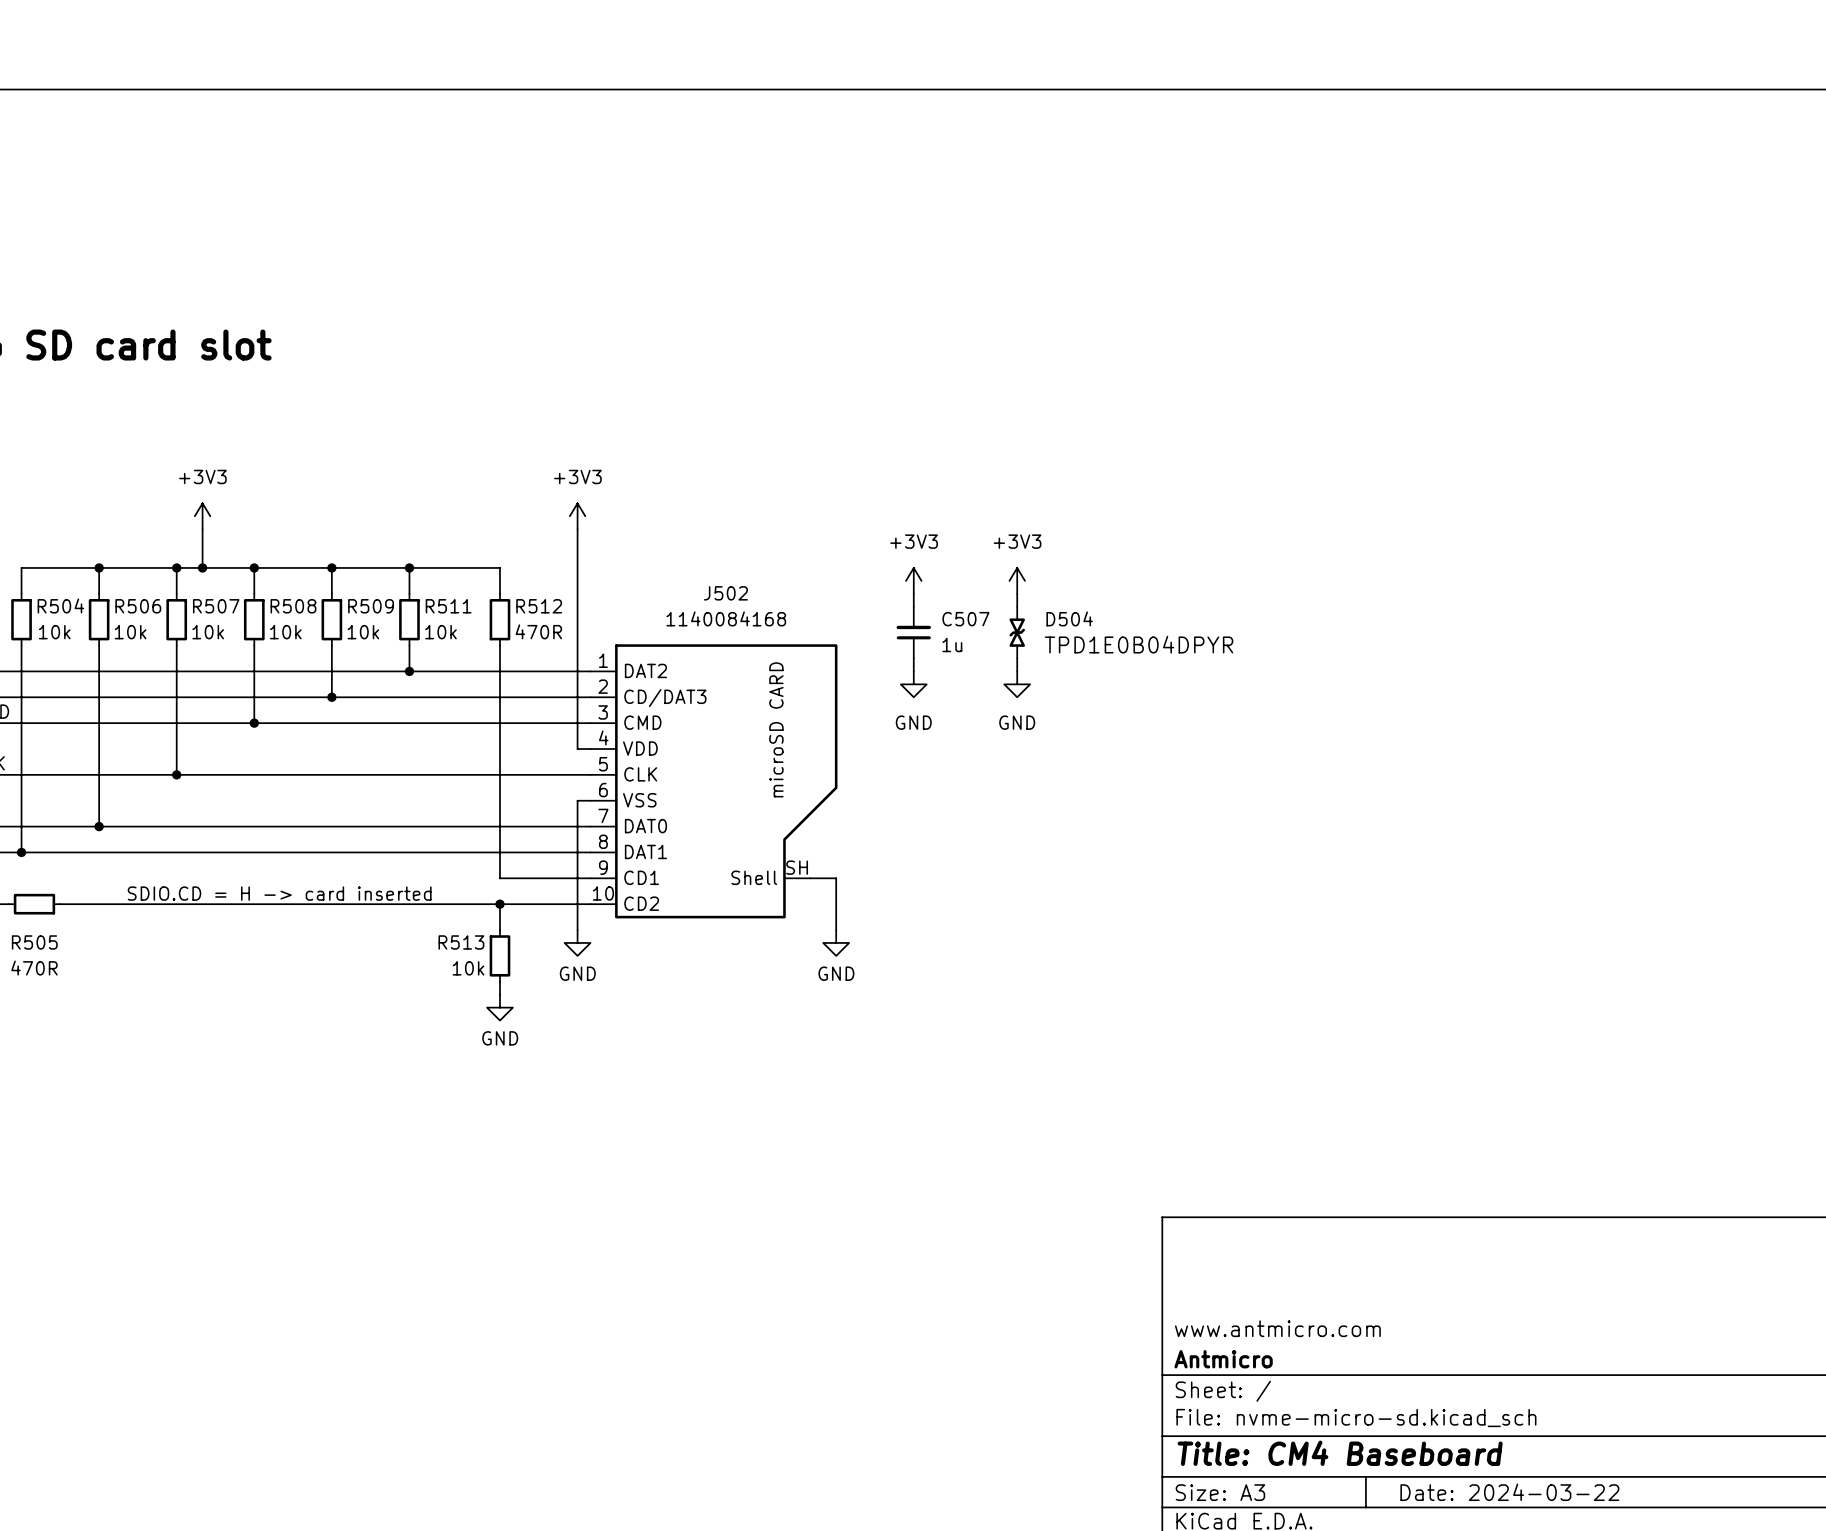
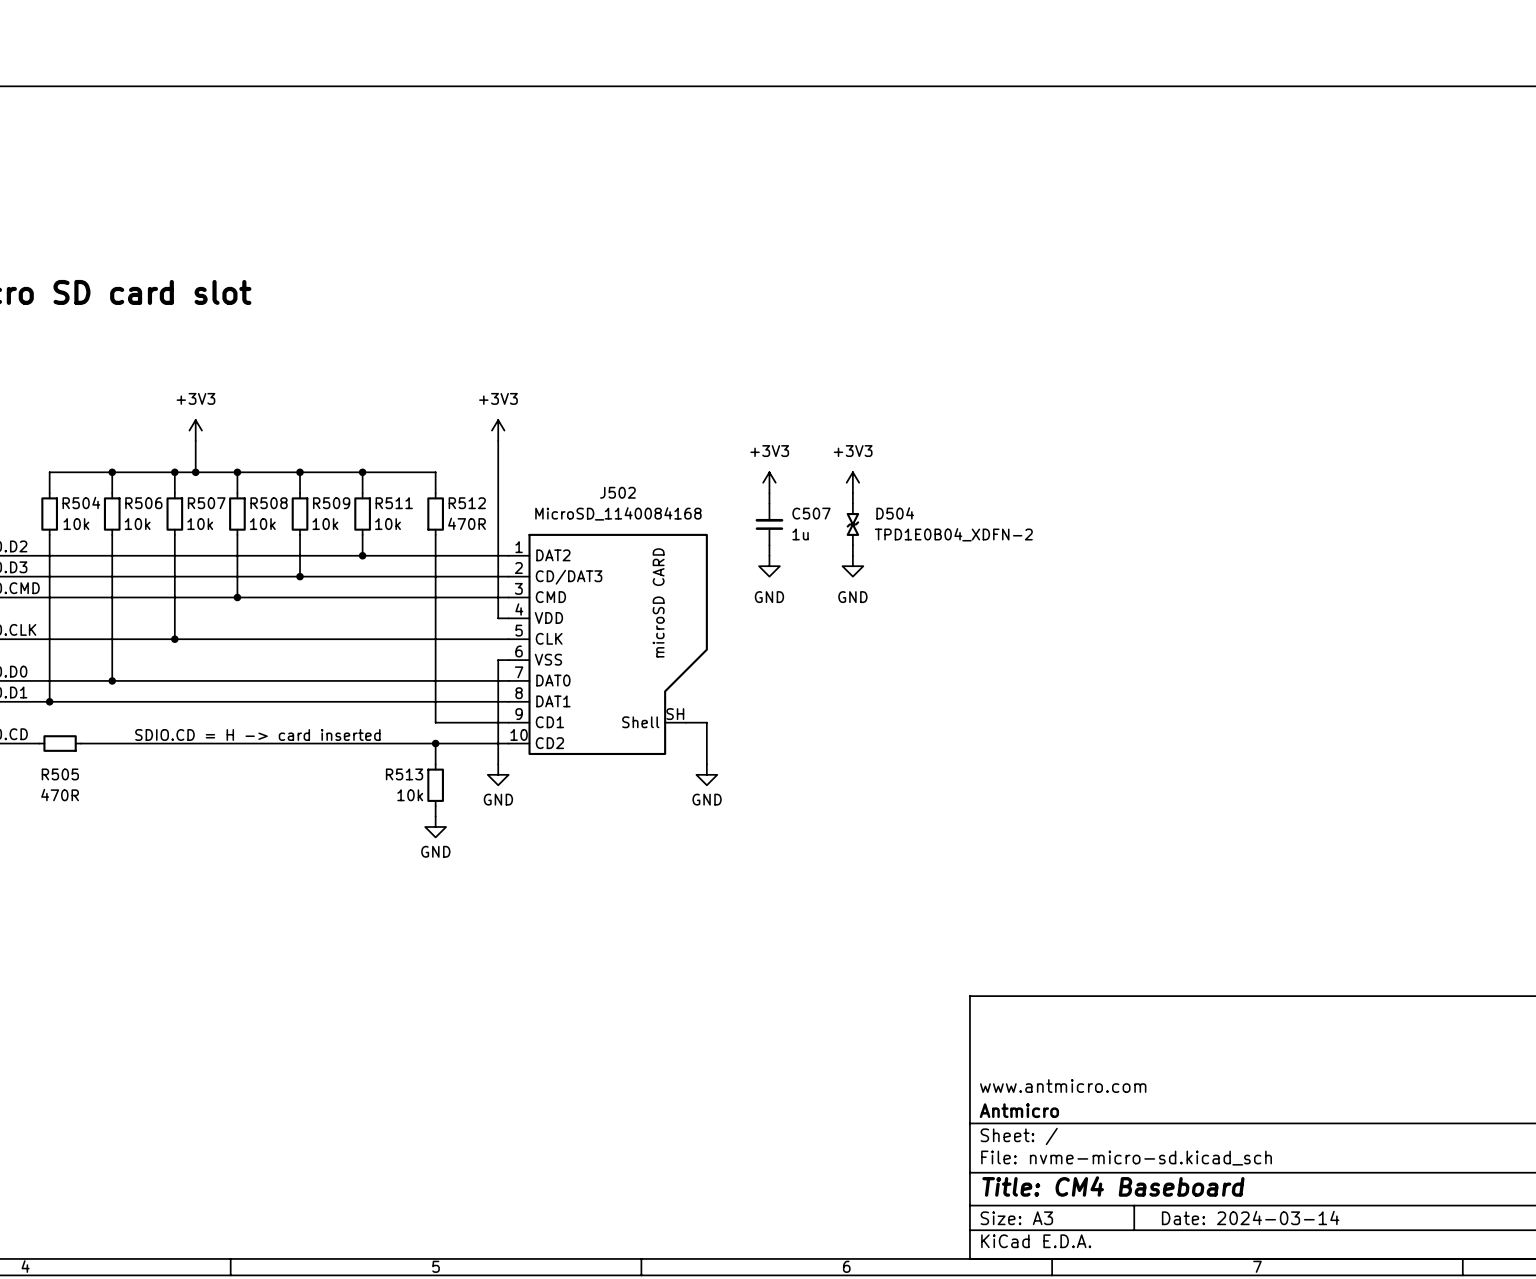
J502 text: 1140084168 (726, 618) -> none
J502 value: none -> MicroSD_1140084168 (618, 513)
D504 text: TPD1E0B04DPYR (1139, 644) -> none
D504 value: none -> TPD1E0B04_XDFN-2 (953, 534)
title block: Date: 2024-03-22 (1509, 1492) -> Date: 2024-03-14 (1250, 1217)

